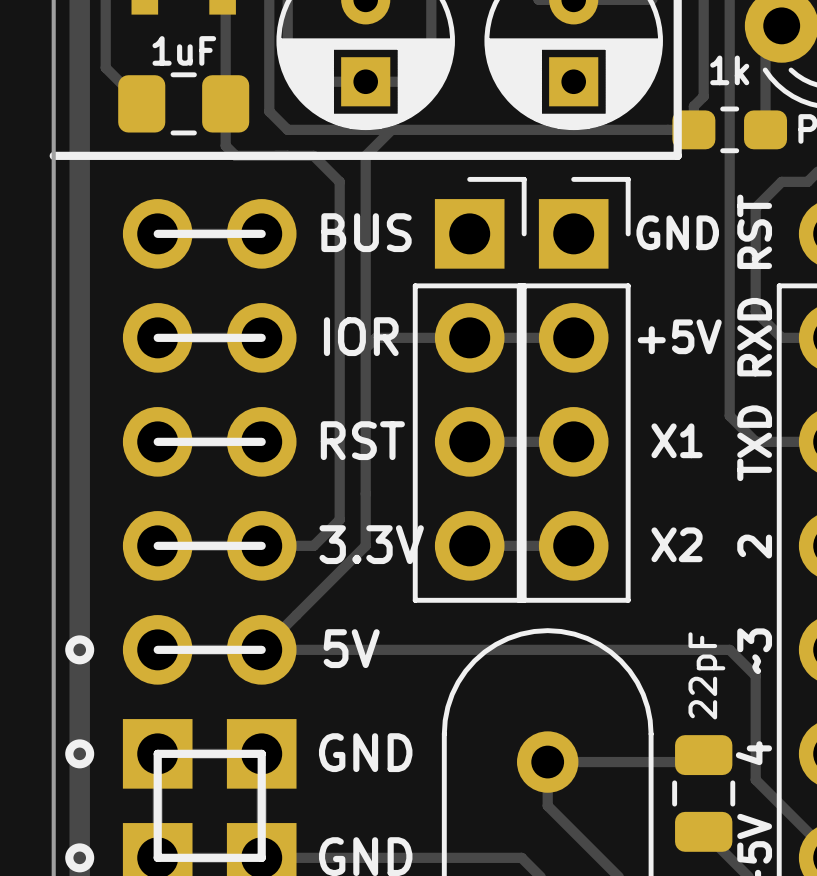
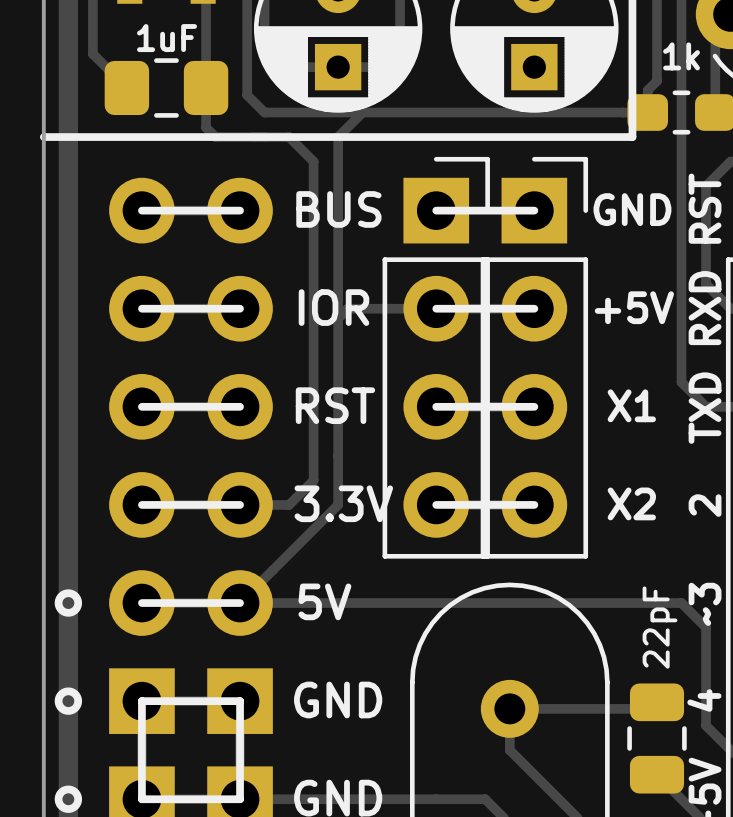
line: none -> (436, 210) (534, 210)
line: none -> (436, 308) (534, 308)
line: none -> (436, 406) (534, 406)
line: none -> (436, 504) (534, 504)

